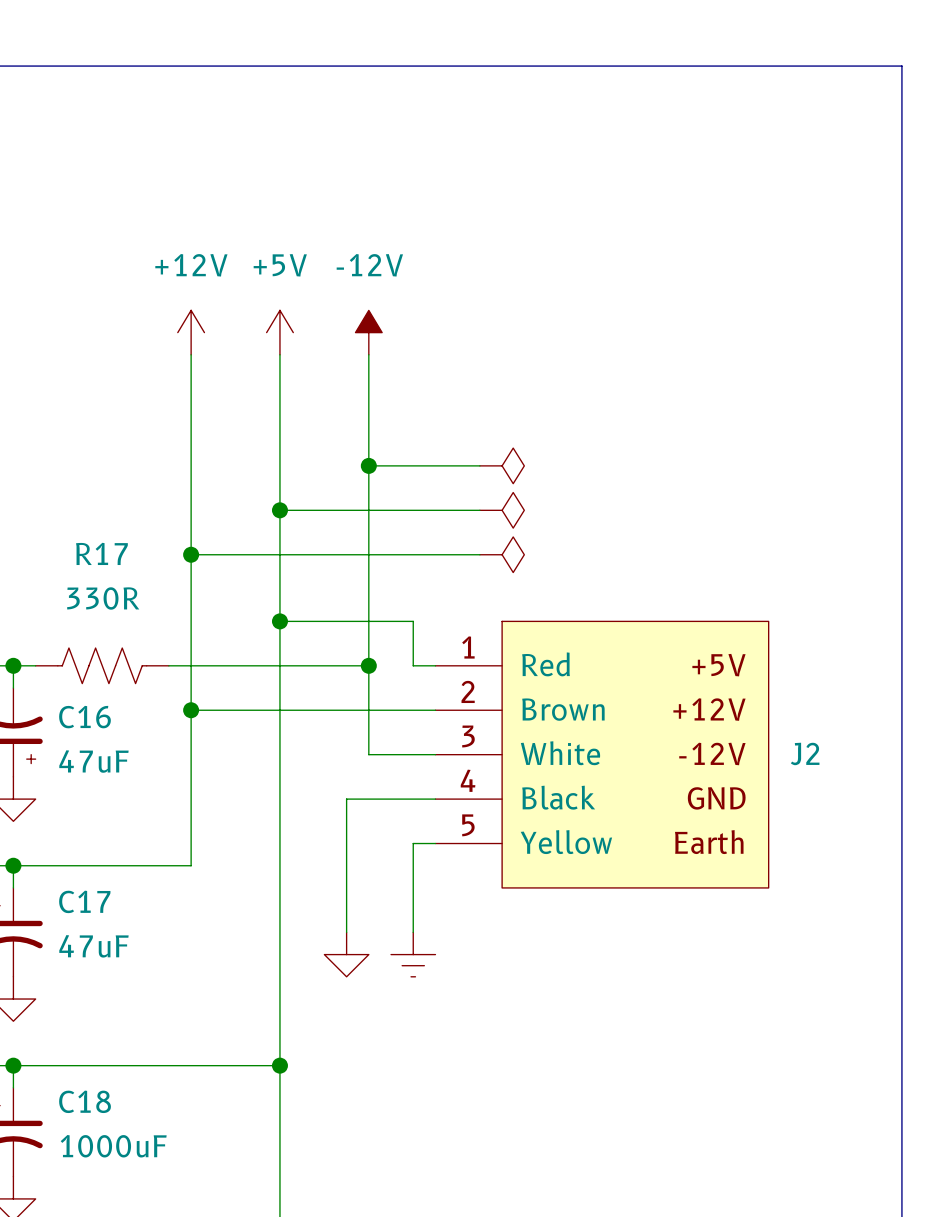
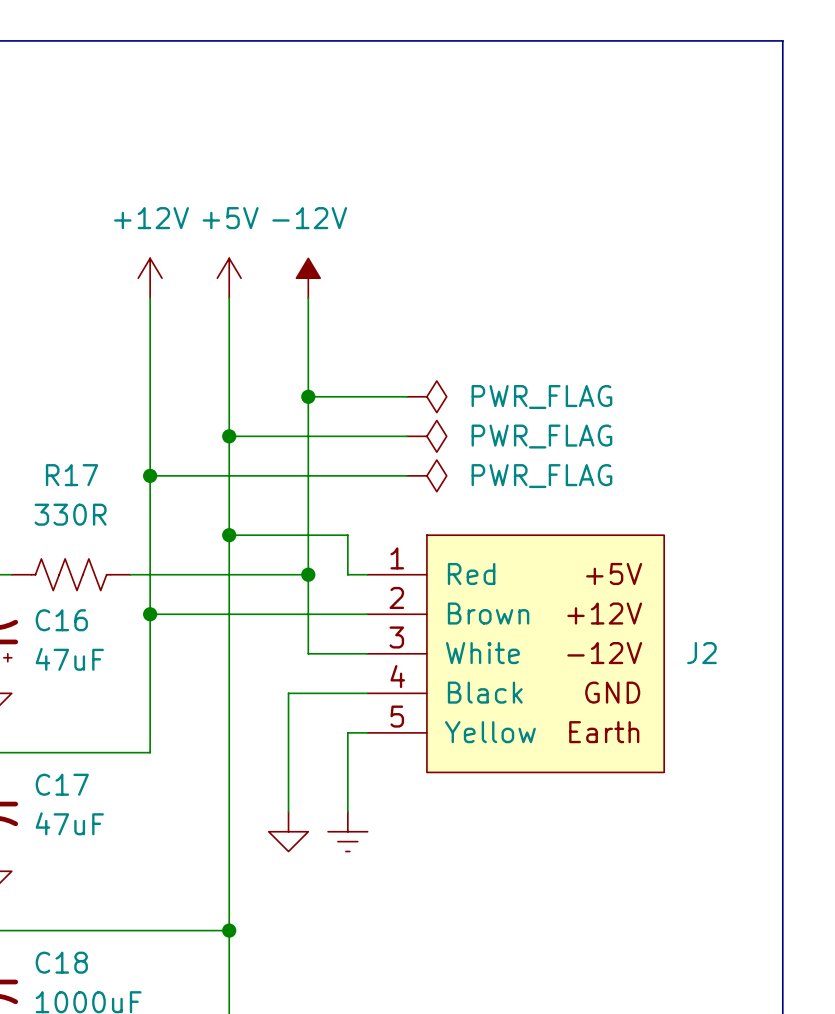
power symbol text: none -> PWR_FLAG (541, 396)
power symbol text: none -> PWR_FLAG (541, 436)
power symbol text: none -> PWR_FLAG (541, 476)

